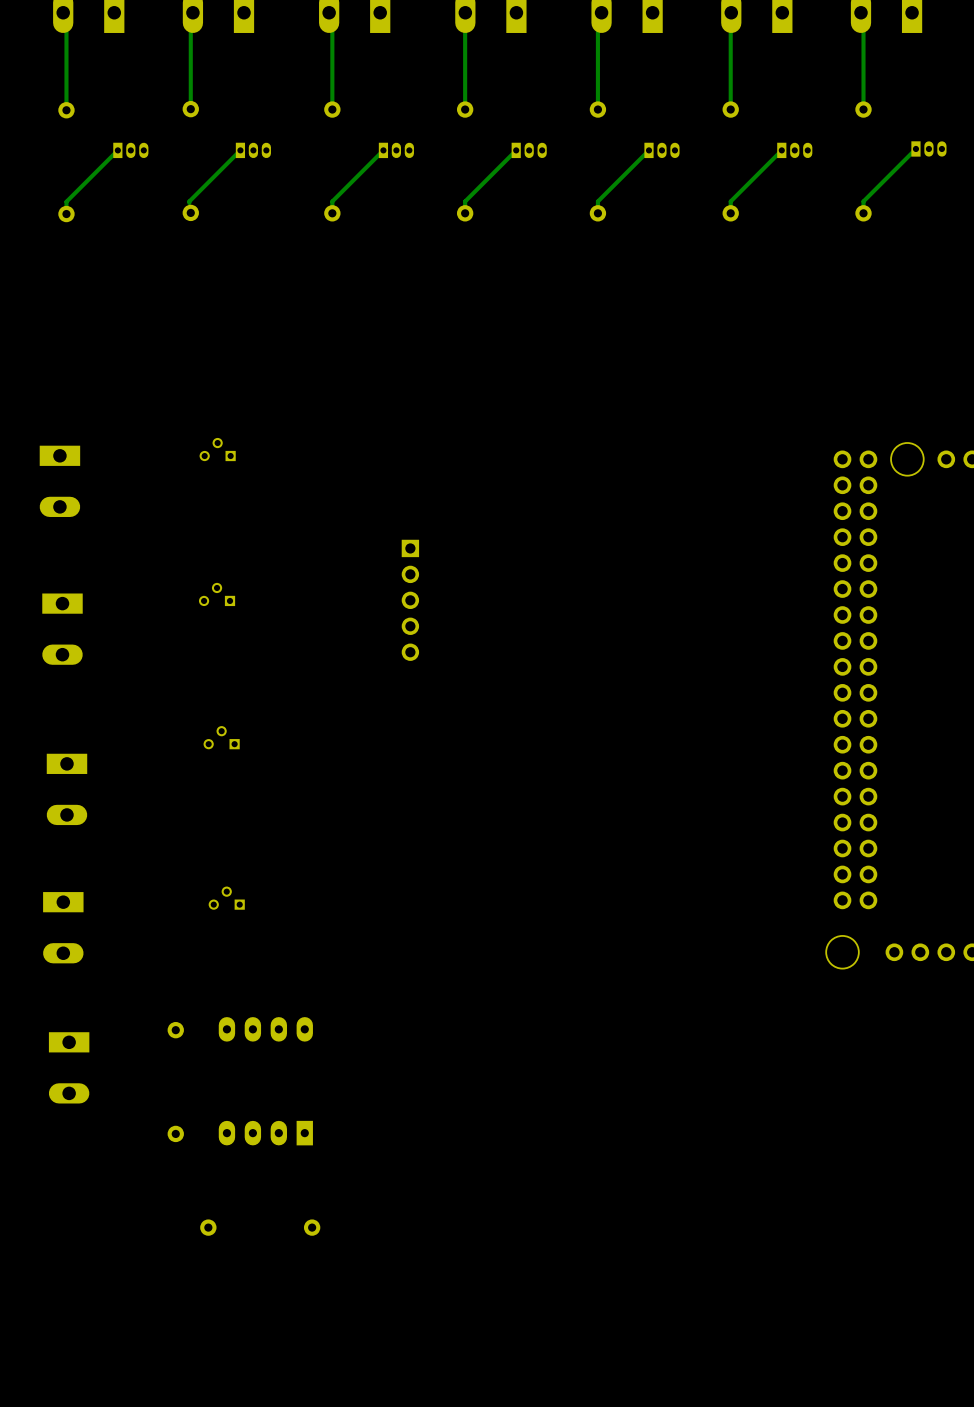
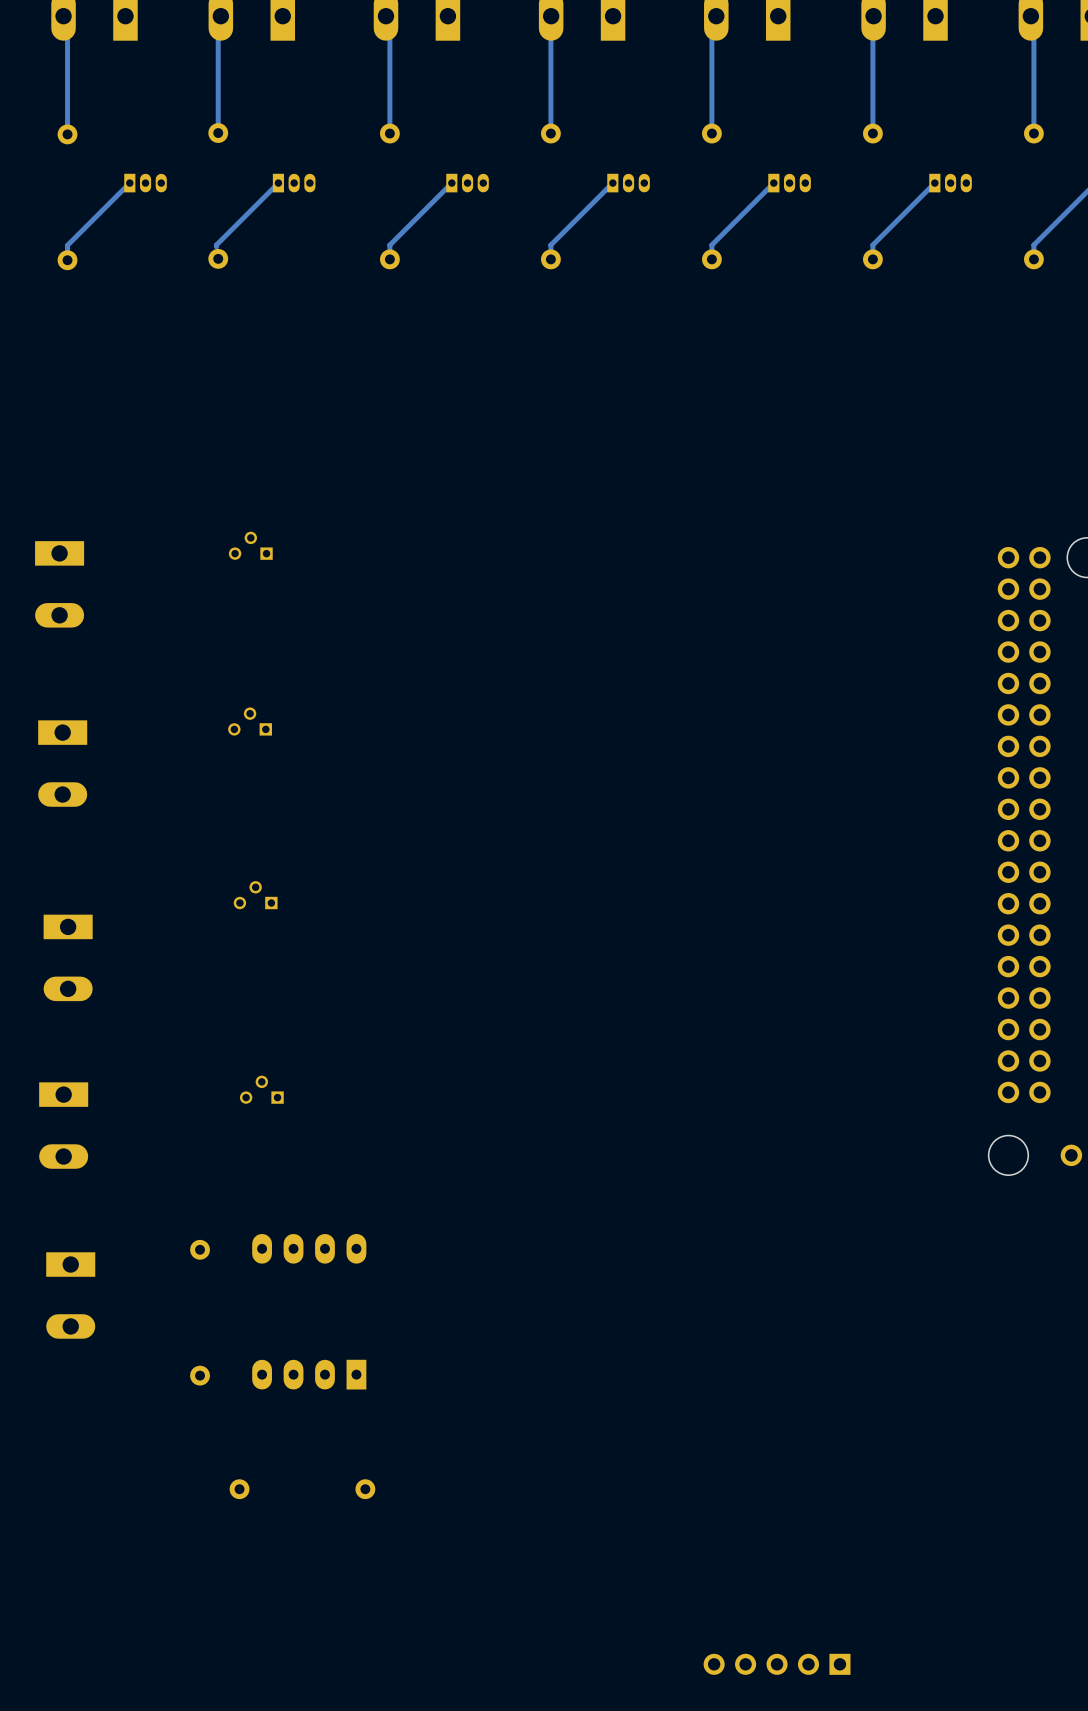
part: (410, 600) -> none
part: none -> (777, 1664)

